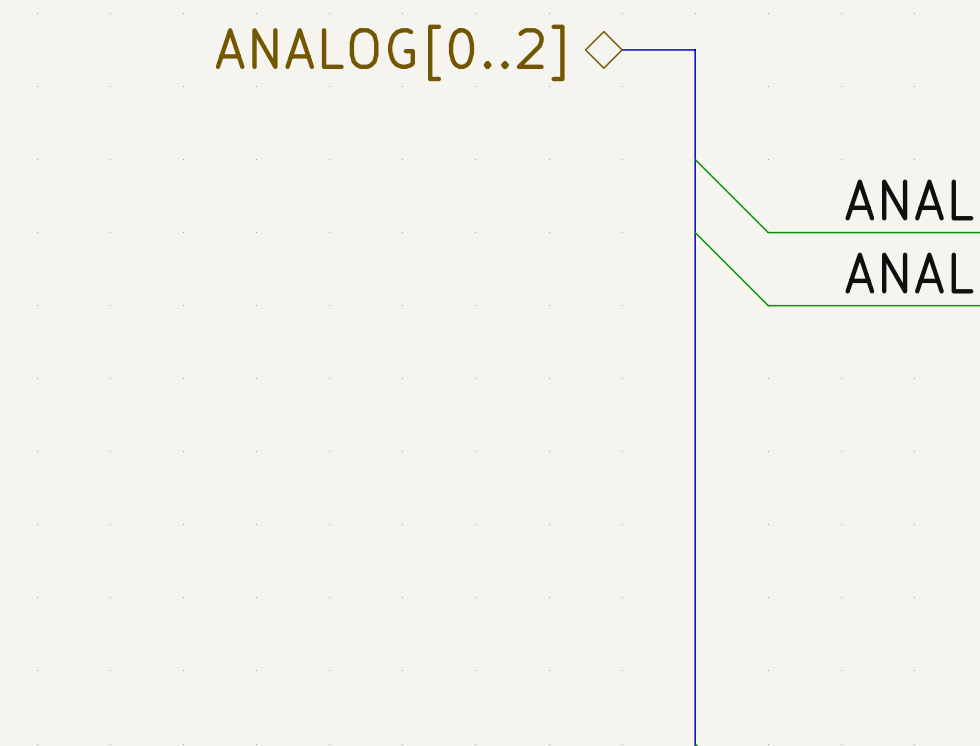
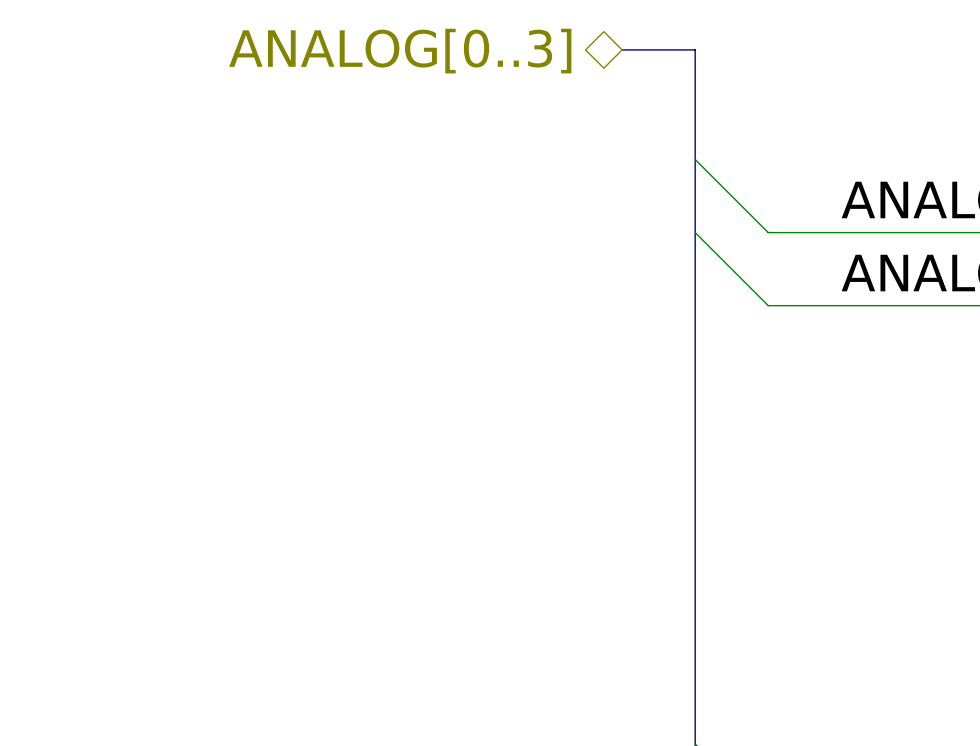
hierarchical label: ANALOG[0..2] (390, 52) -> ANALOG[0..3] (400, 51)

